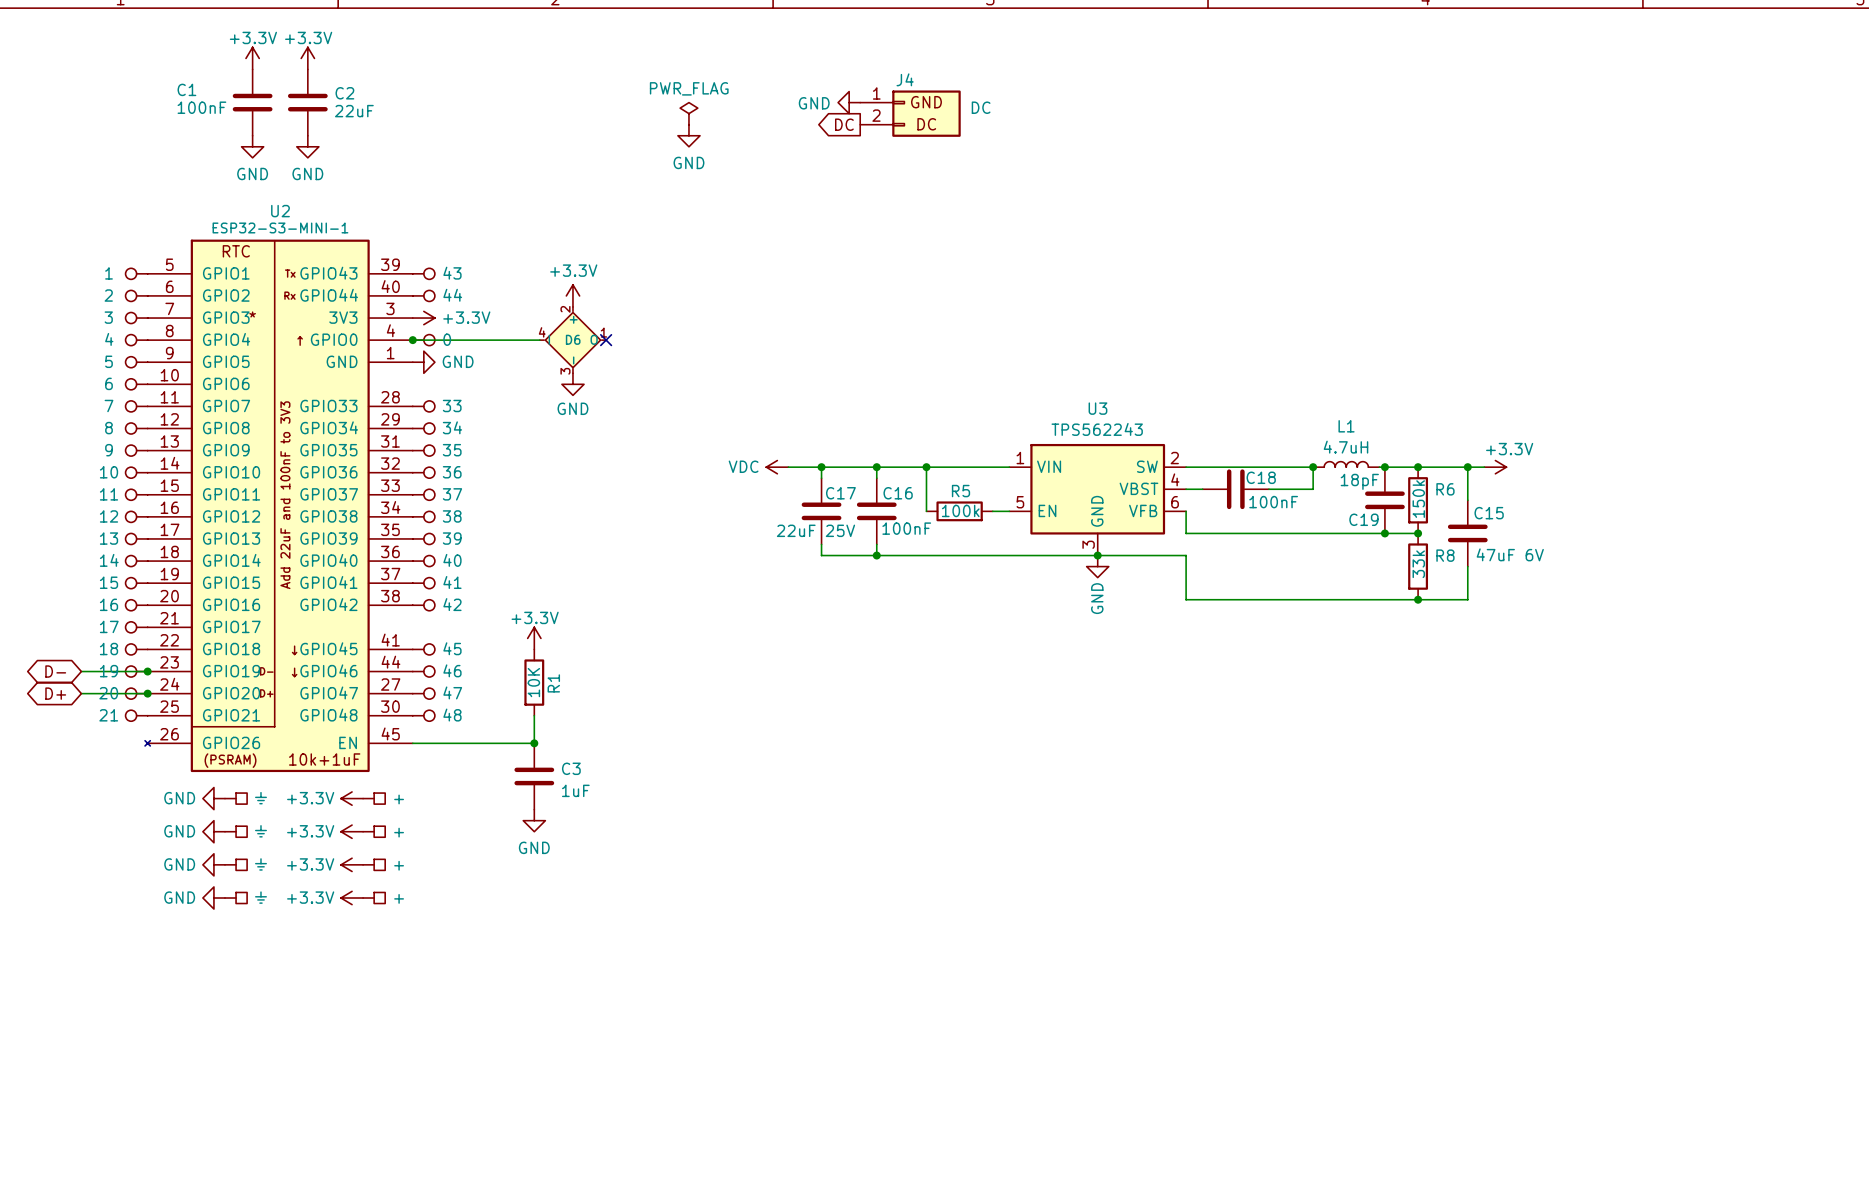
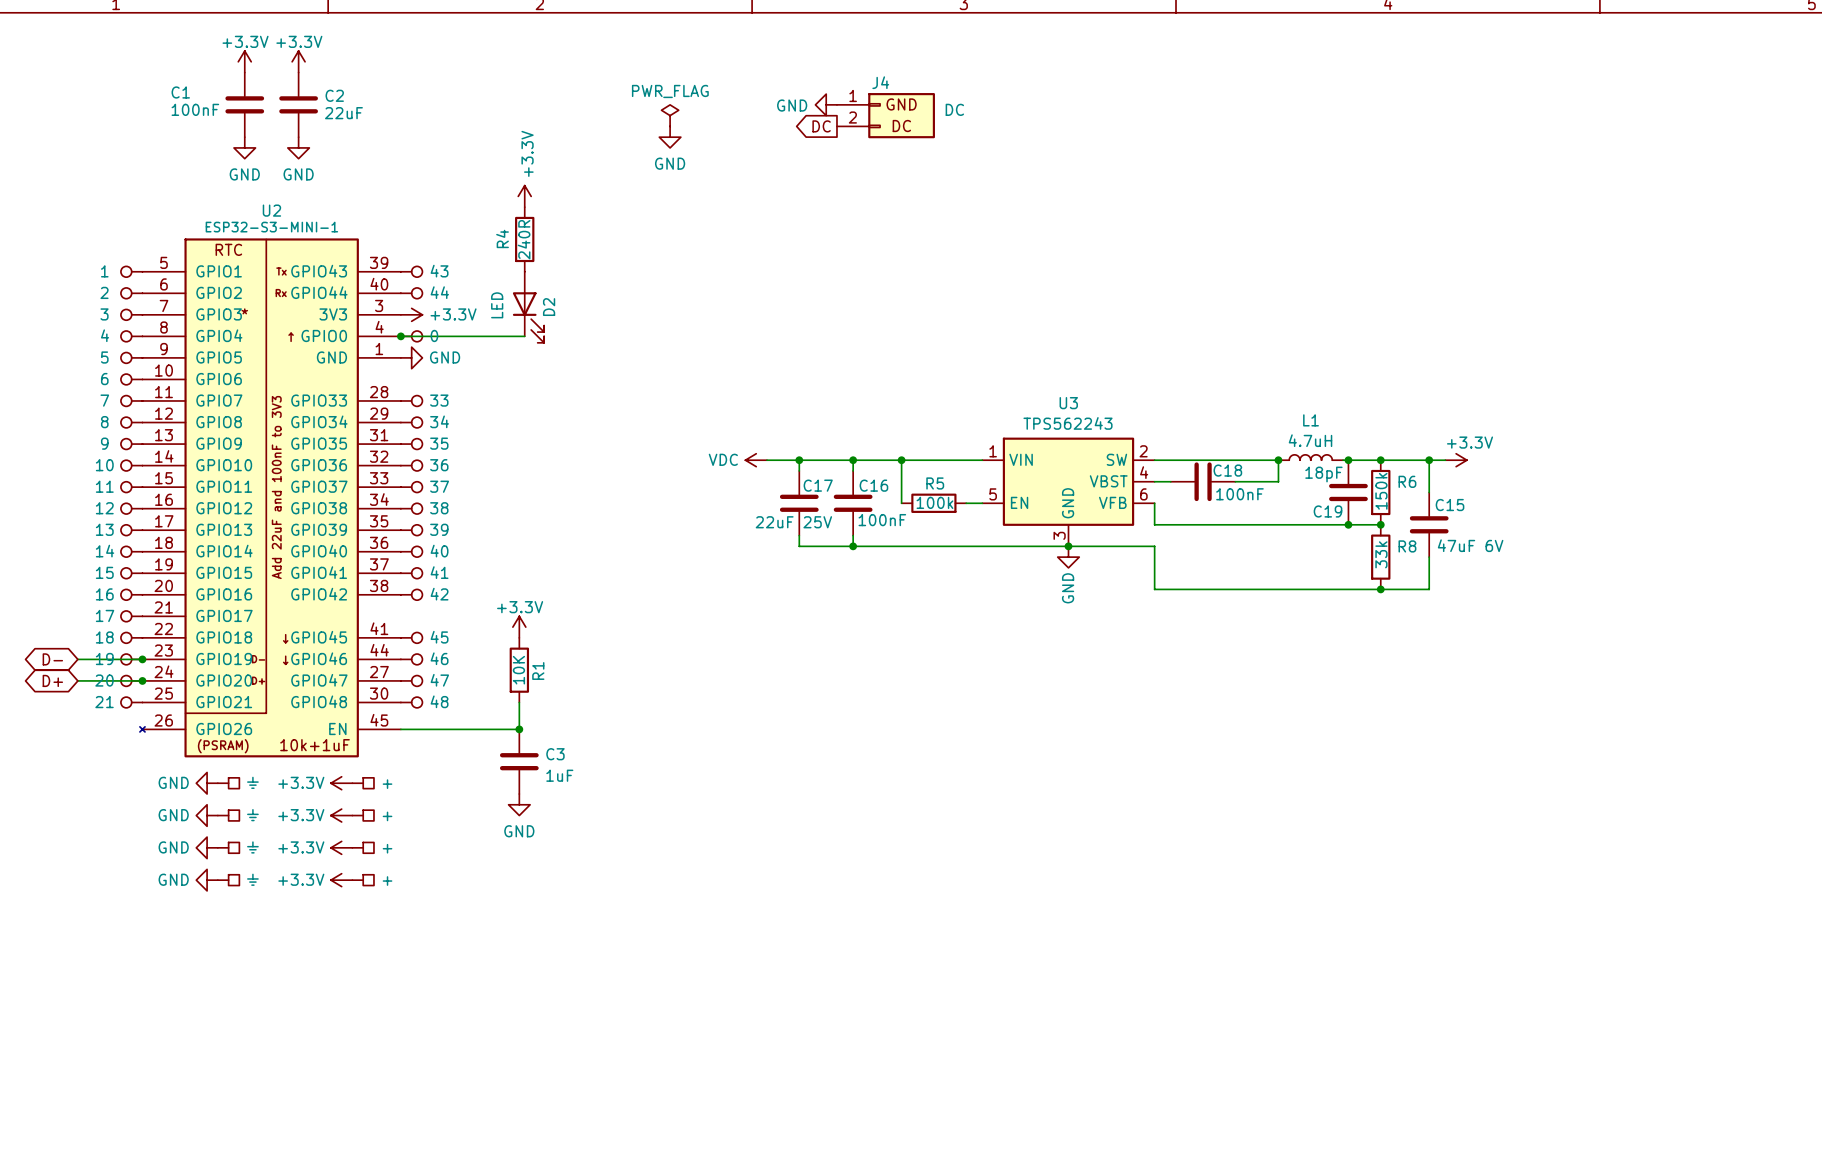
R4: none -> 240R (524, 239)
power symbol text rotation: 0° (573, 270) -> 90° counterclockwise (527, 153)
power symbol position: +3.3V (572, 295) -> +3.3V (524, 196)
D2: none -> LED (528, 307)
D6: (572, 340) -> none
no-connect mark: (606, 340) -> none
power symbol: GND (572, 384) -> none

